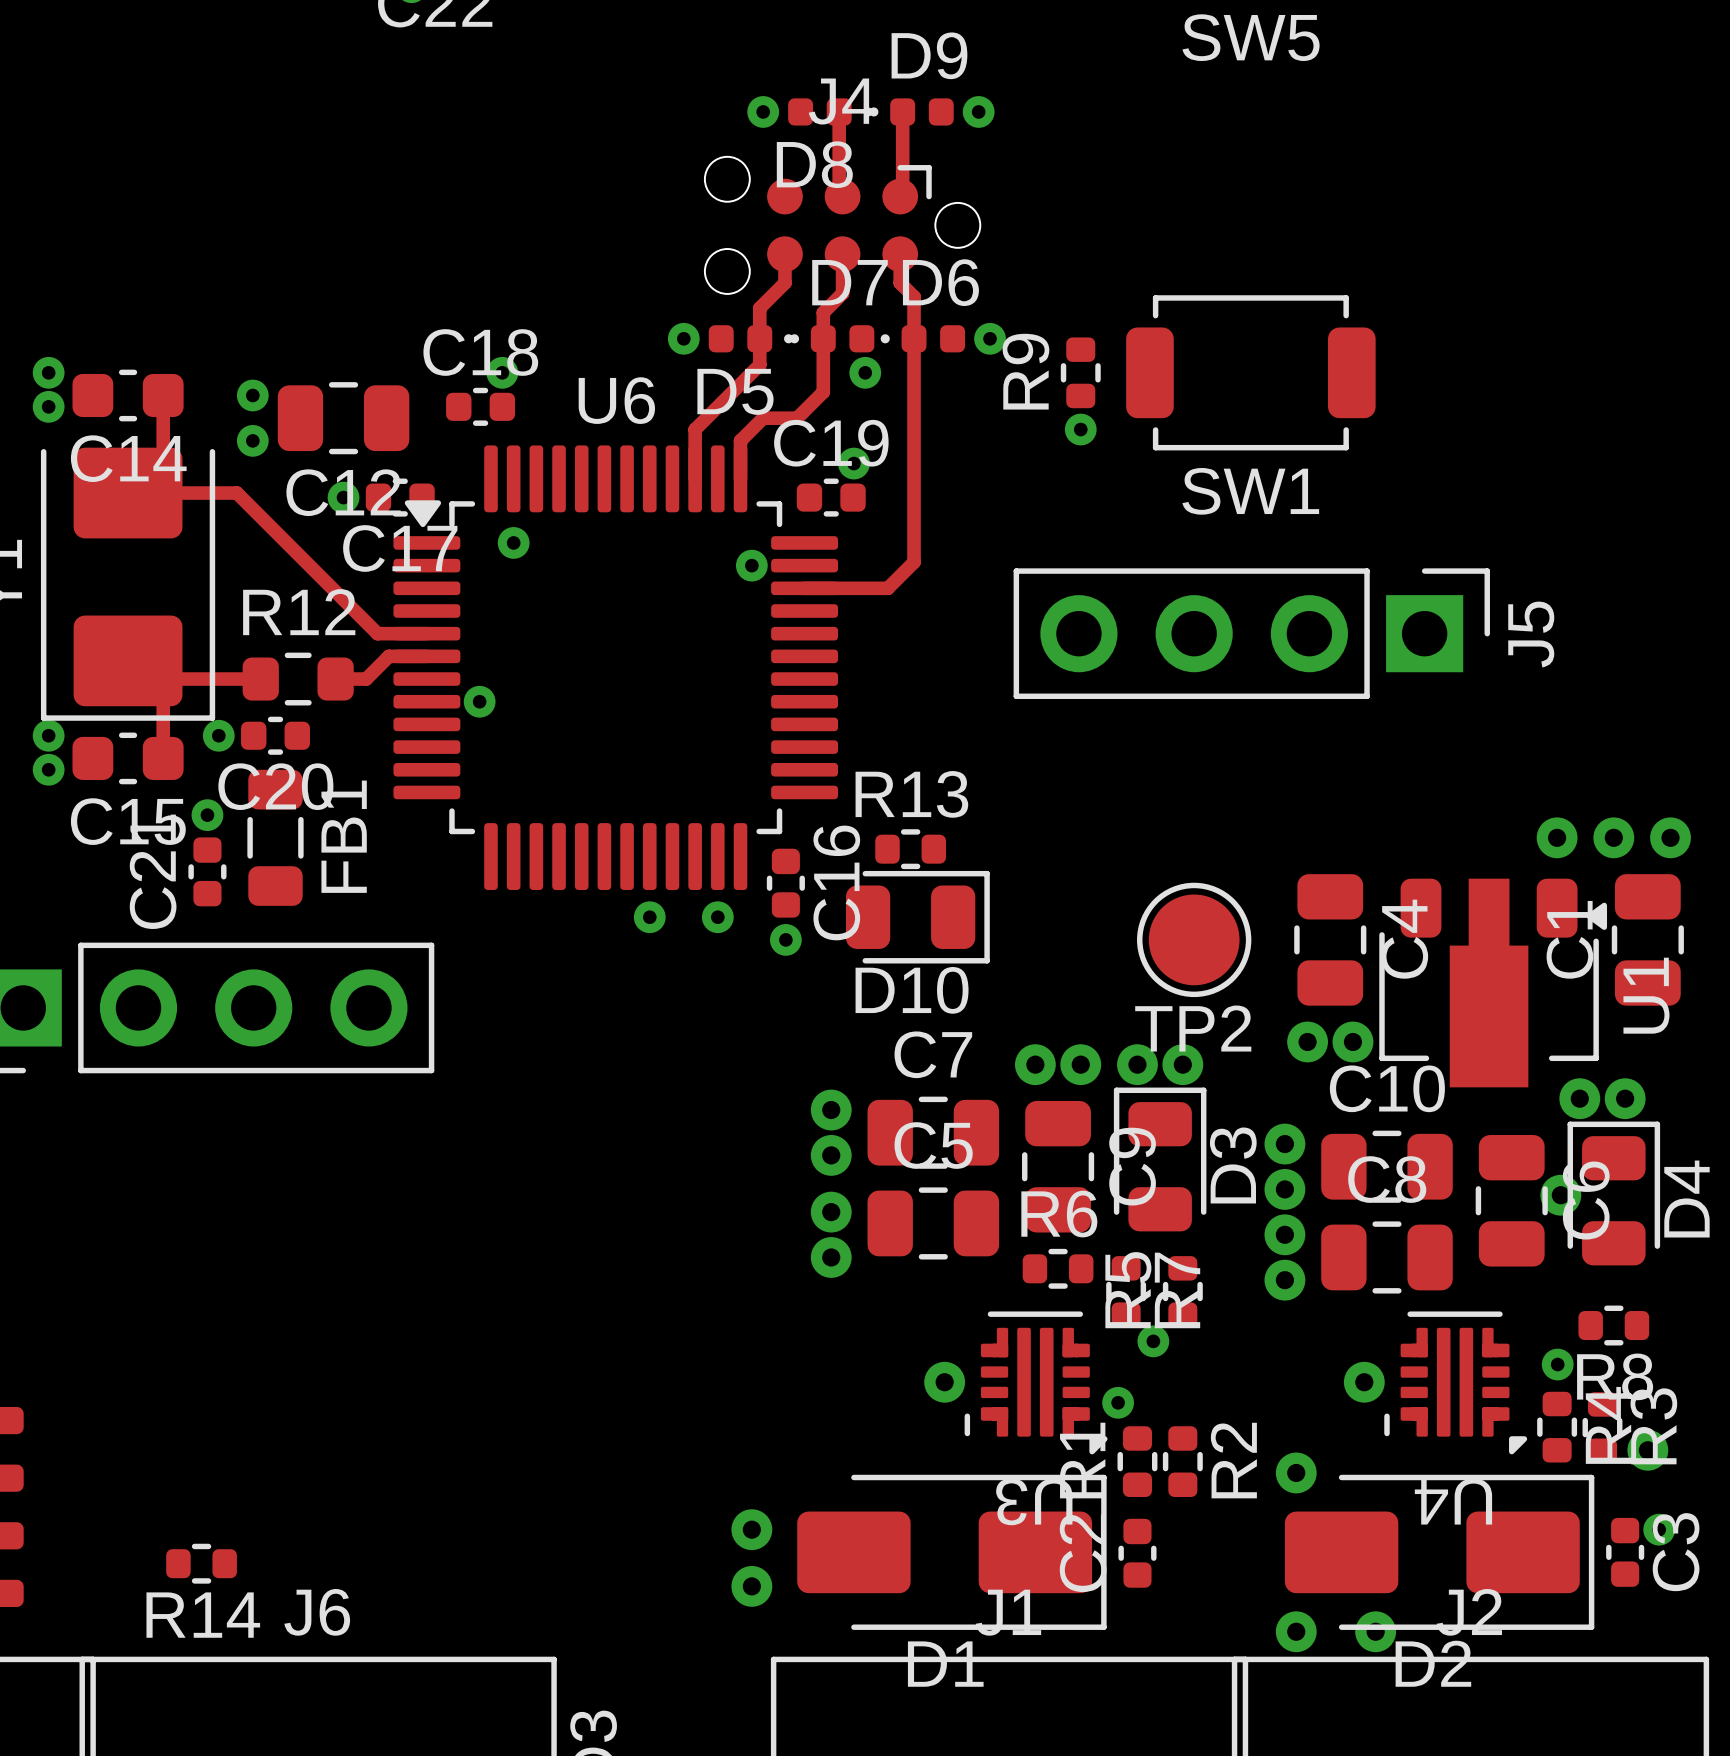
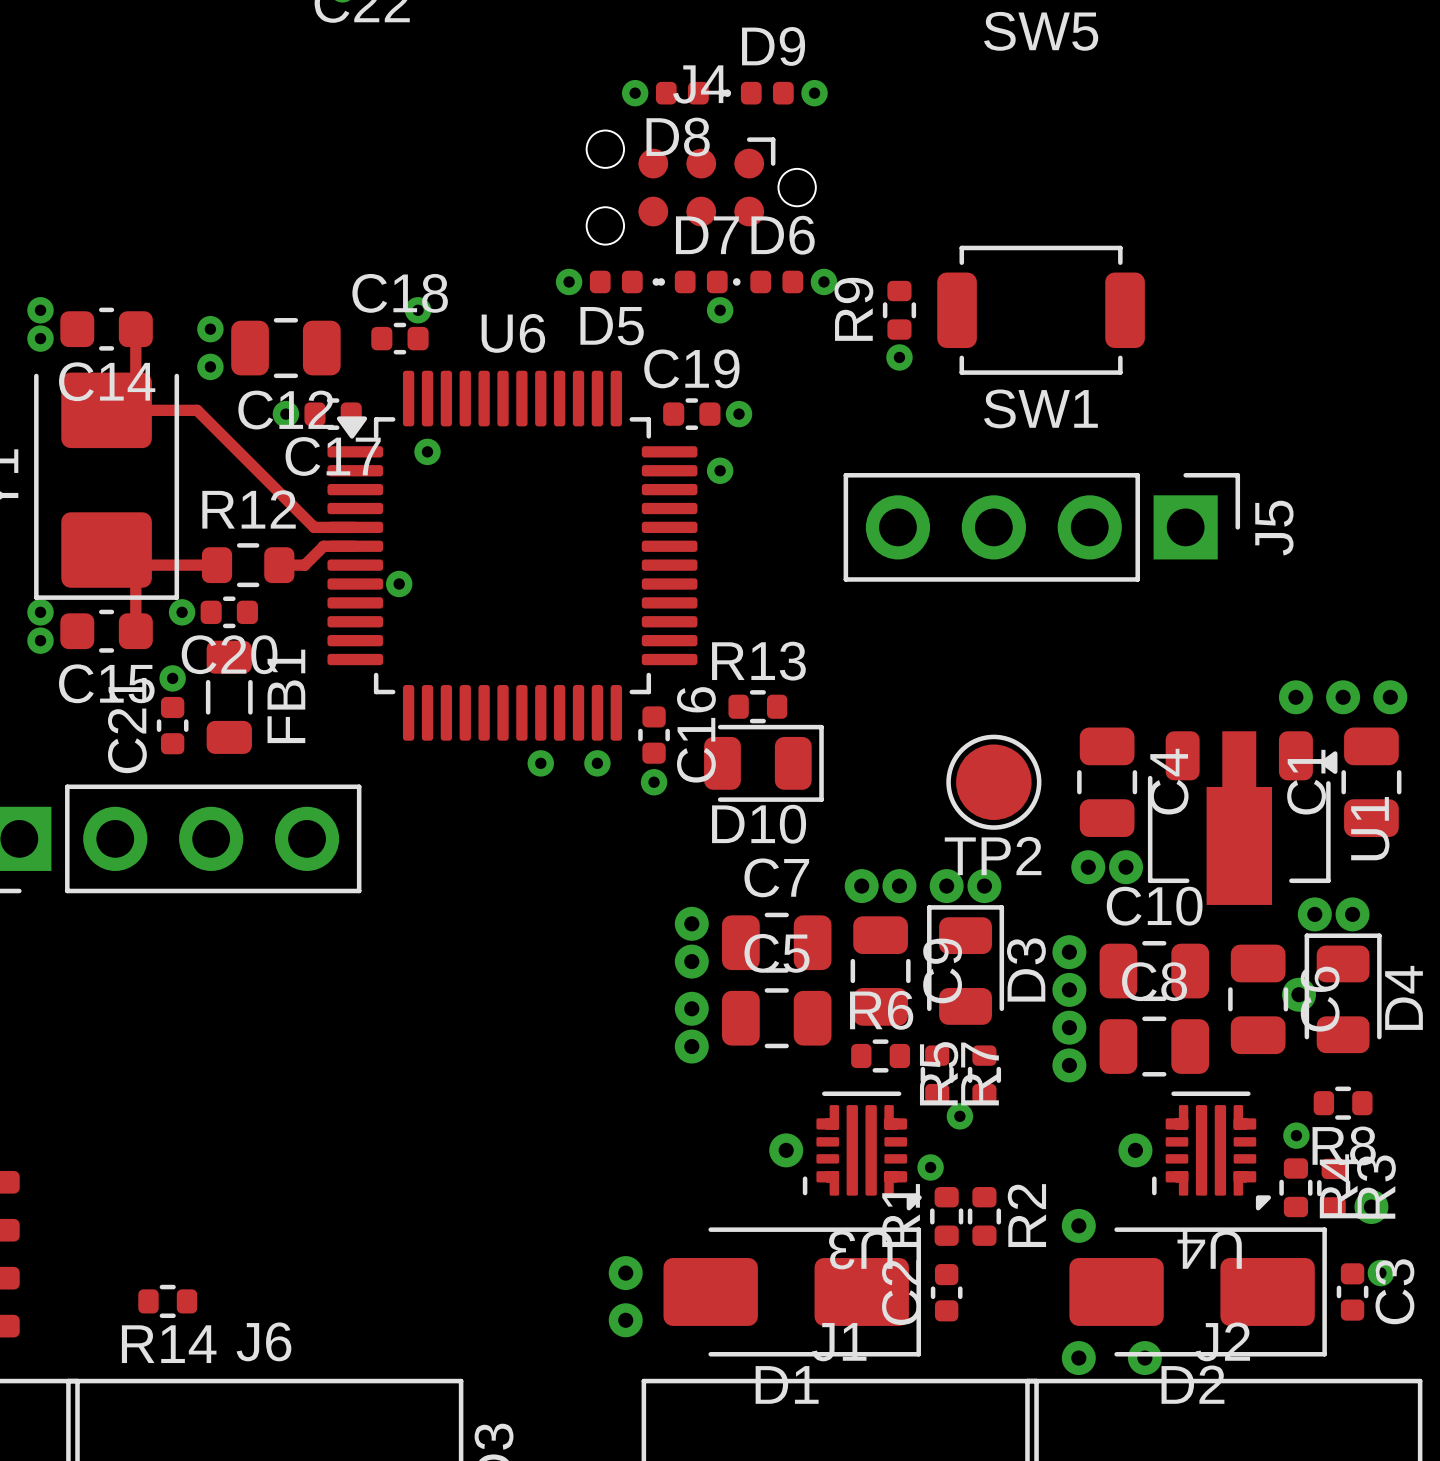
track: (839, 111) (839, 193) (842, 196) -> none
track: (902, 111) (902, 194) (900, 196) -> none
track: (784, 254) (784, 282) (759, 308) (759, 364) (695, 429) (695, 478) -> none
track: (842, 254) (842, 293) (823, 312) (823, 392) (797, 418) (763, 418) (740, 440) (740, 478) -> none
track: (900, 254) (900, 282) (914, 296) (914, 562) (887, 588) (804, 588) -> none
via position: (853, 463) -> (739, 414)
via: (751, 565) -> none
via: none -> (720, 470)

